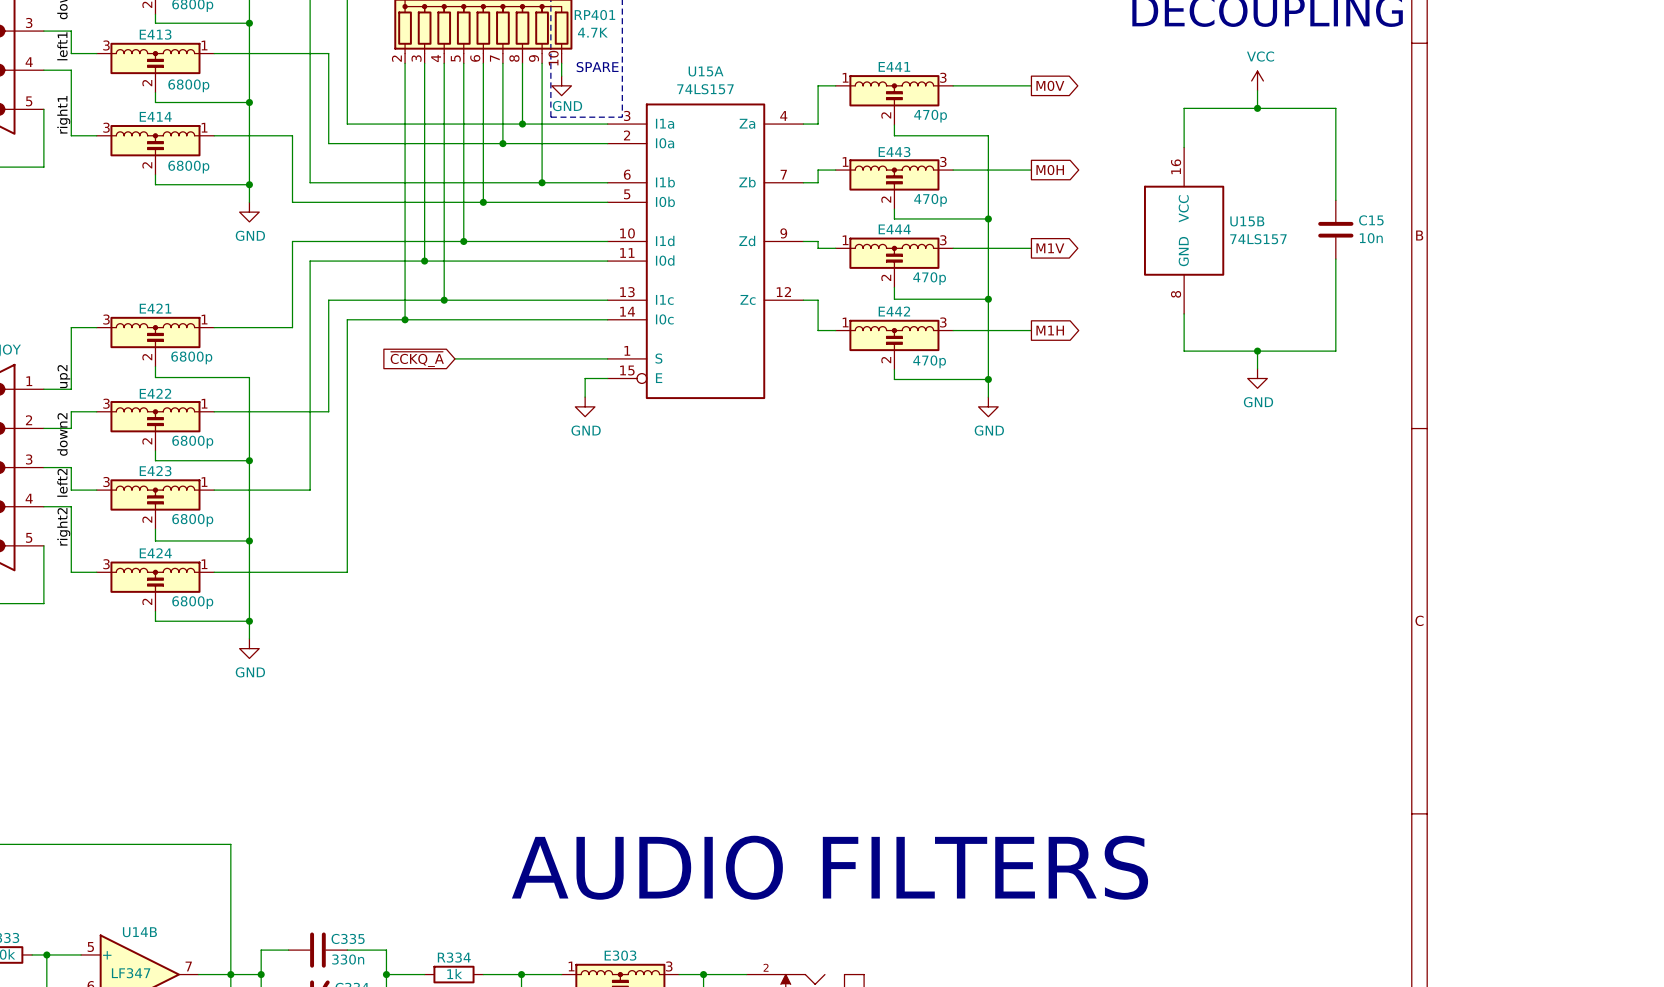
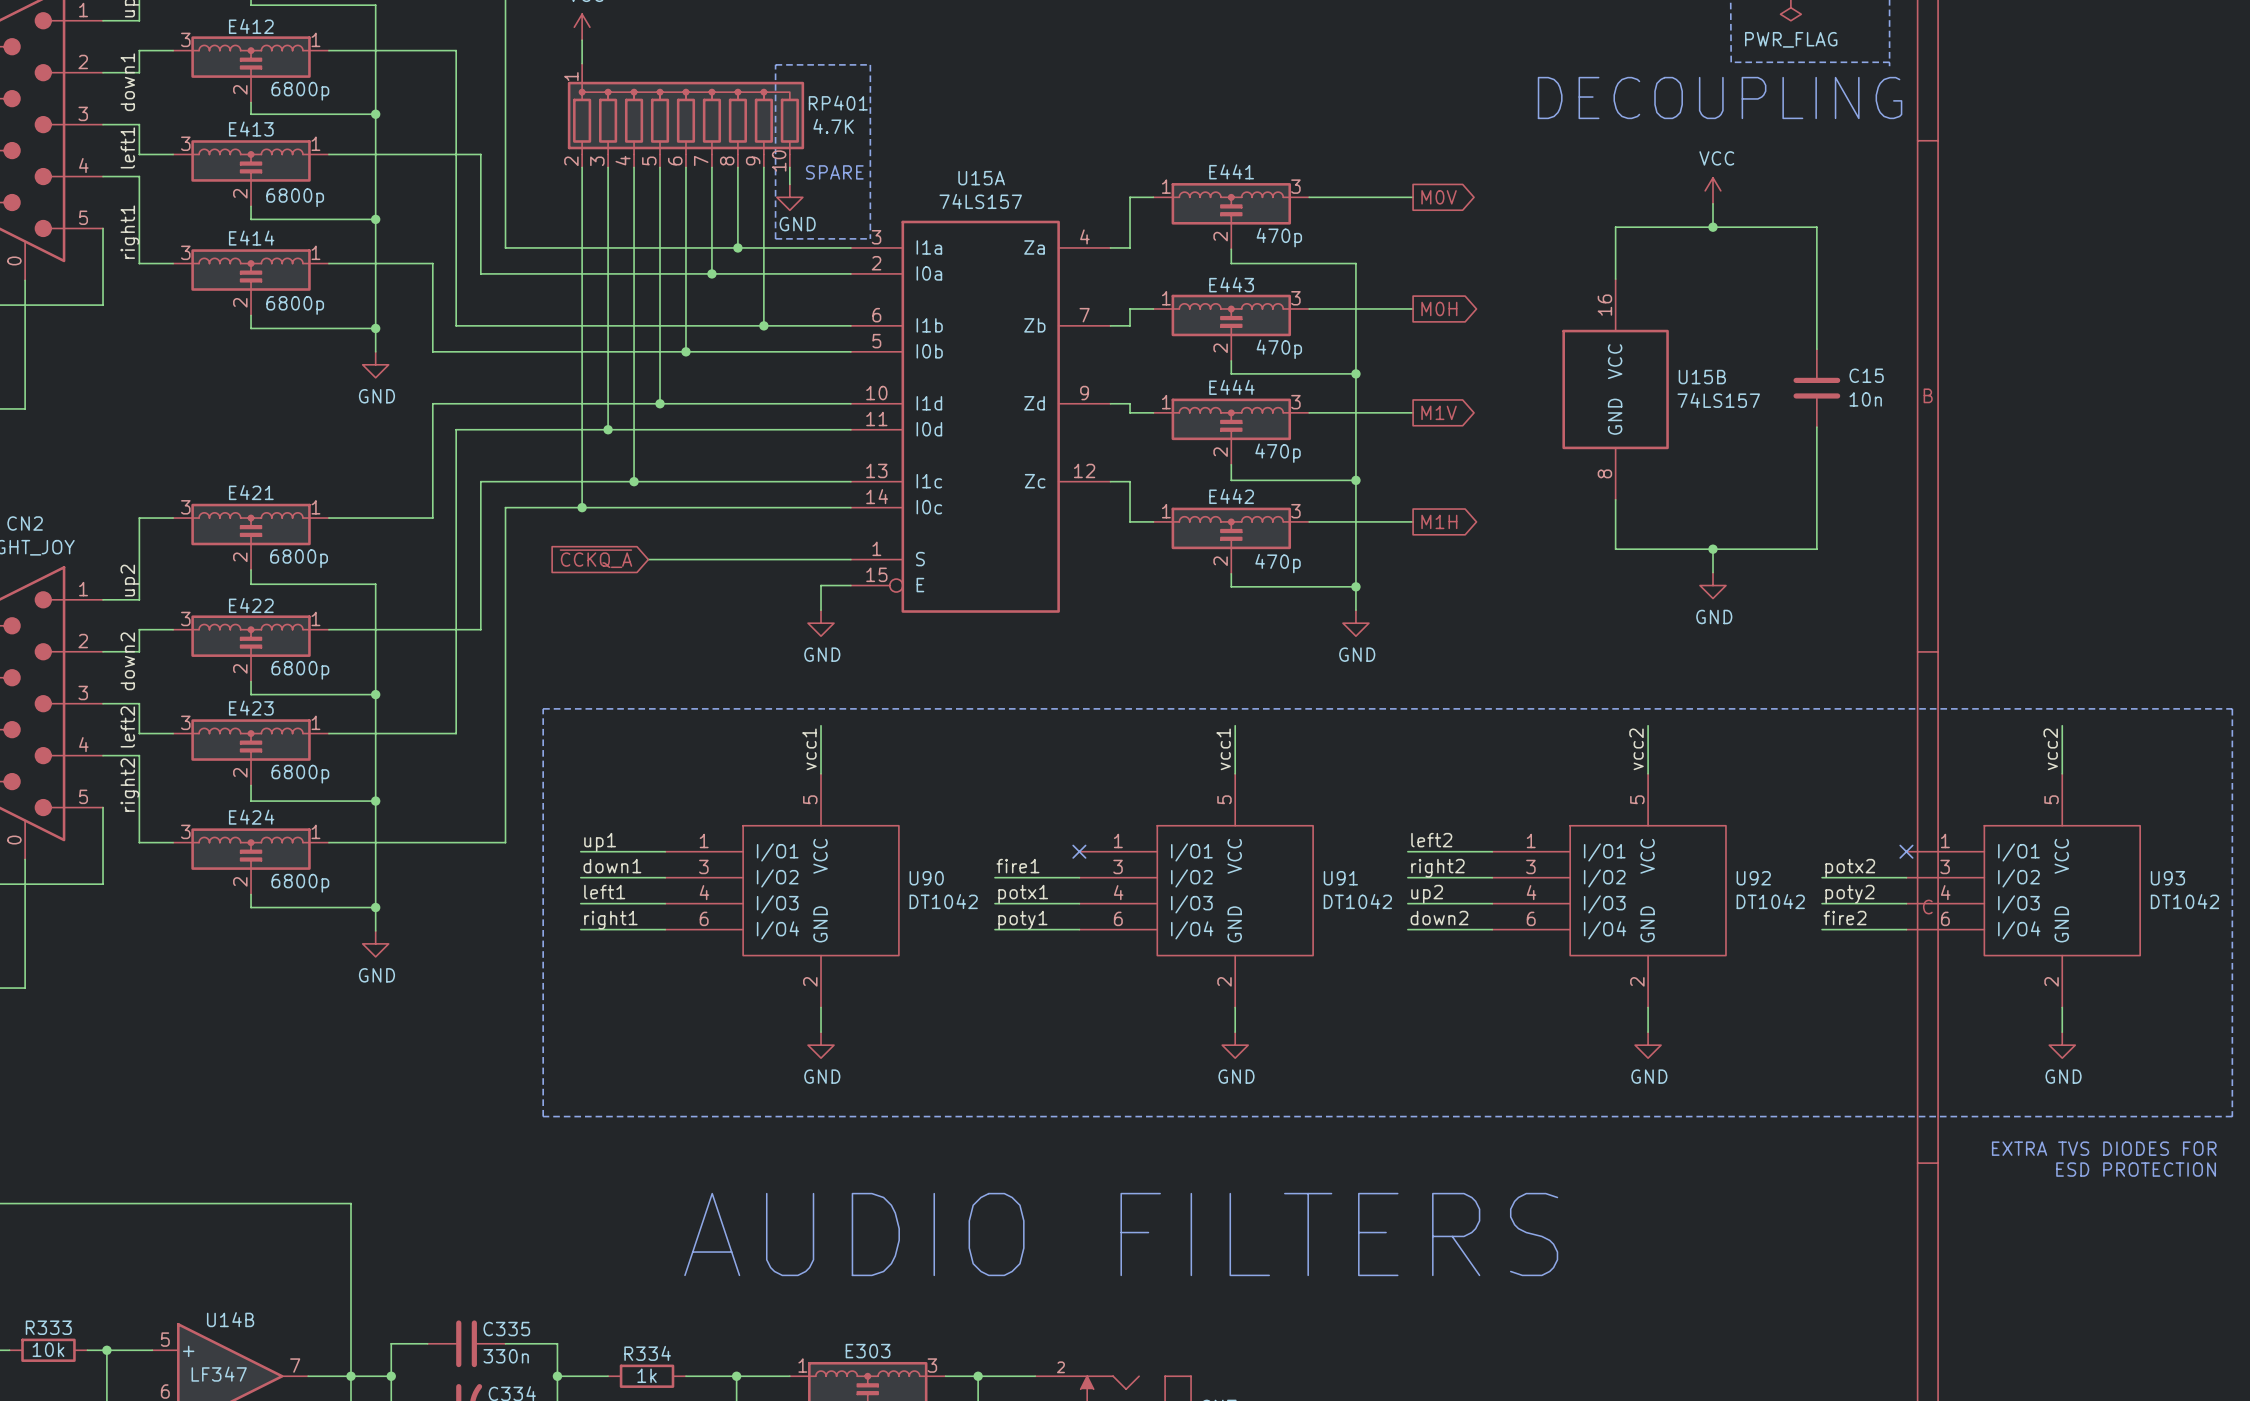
line: none -> (543, 708) (2232, 708) (2232, 1116) (543, 1116) (543, 708)
wire: none -> (821, 725) (821, 773)
wire: none -> (1235, 725) (1235, 773)
wire: none -> (1648, 725) (1648, 773)
wire: none -> (2062, 725) (2062, 773)
label: none -> vcc1 (809, 749)
label: none -> vcc1 (1223, 749)
label: none -> vcc2 (1636, 749)
label: none -> vcc2 (2050, 749)
label: none -> left2 (1431, 840)
label: none -> up1 (600, 842)
wire: none -> (580, 851) (665, 851)
no-connect mark: none -> (1079, 851)
wire: none -> (1407, 851) (1492, 851)
no-connect mark: none -> (1906, 851)
label: none -> down1 (612, 866)
label: none -> fire1 (1017, 866)
label: none -> right2 (1437, 868)
label: none -> potx2 (1850, 868)
wire: none -> (580, 877) (665, 877)
wire: none -> (994, 877) (1079, 877)
wire: none -> (1407, 877) (1492, 877)
wire: none -> (1822, 877) (1906, 877)
U90: none -> DT1042 (782, 890)
U91: none -> DT1042 (1196, 890)
U92: none -> DT1042 (1609, 890)
U93: none -> DT1042 (2023, 890)
label: none -> left1 (604, 892)
label: none -> potx1 (1023, 894)
label: none -> up2 (1427, 894)
label: none -> poty2 (1849, 894)
wire: none -> (580, 903) (665, 903)
wire: none -> (994, 903) (1079, 903)
wire: none -> (1407, 903) (1492, 903)
wire: none -> (1822, 903) (1906, 903)
label: none -> down2 (1439, 918)
label: none -> fire2 (1845, 918)
label: none -> right1 (610, 920)
label: none -> poty1 (1022, 920)
wire: none -> (580, 929) (665, 929)
wire: none -> (994, 929) (1079, 929)
wire: none -> (1407, 929) (1492, 929)
wire: none -> (1822, 929) (1906, 929)
wire: none -> (821, 1007) (821, 1032)
wire: none -> (1235, 1007) (1235, 1032)
wire: none -> (1648, 1007) (1648, 1032)
wire: none -> (2062, 1007) (2062, 1032)
power symbol: none -> GND (821, 1045)
power symbol: none -> GND (1235, 1045)
power symbol: none -> GND (1648, 1045)
power symbol: none -> GND (2062, 1045)
text: none -> EXTRA TVS DIODES FOR (2104, 1148)
text: none -> ESD PROTECTION (2136, 1169)

